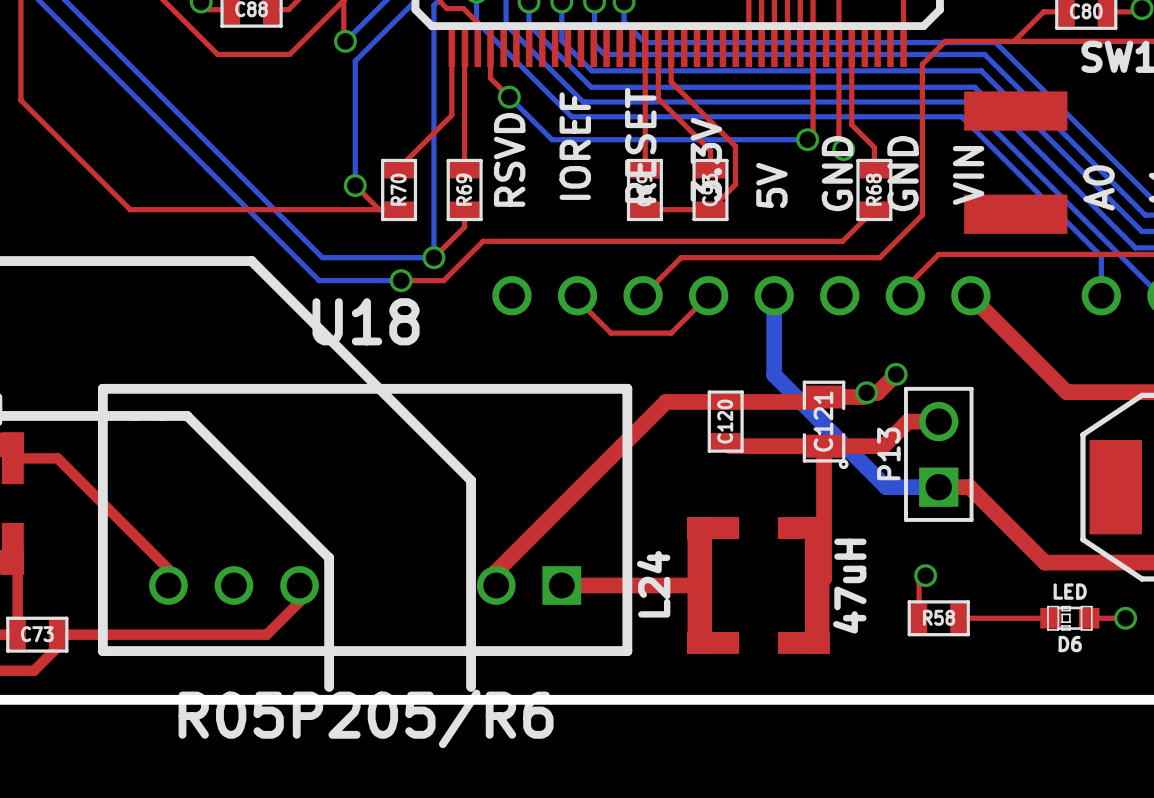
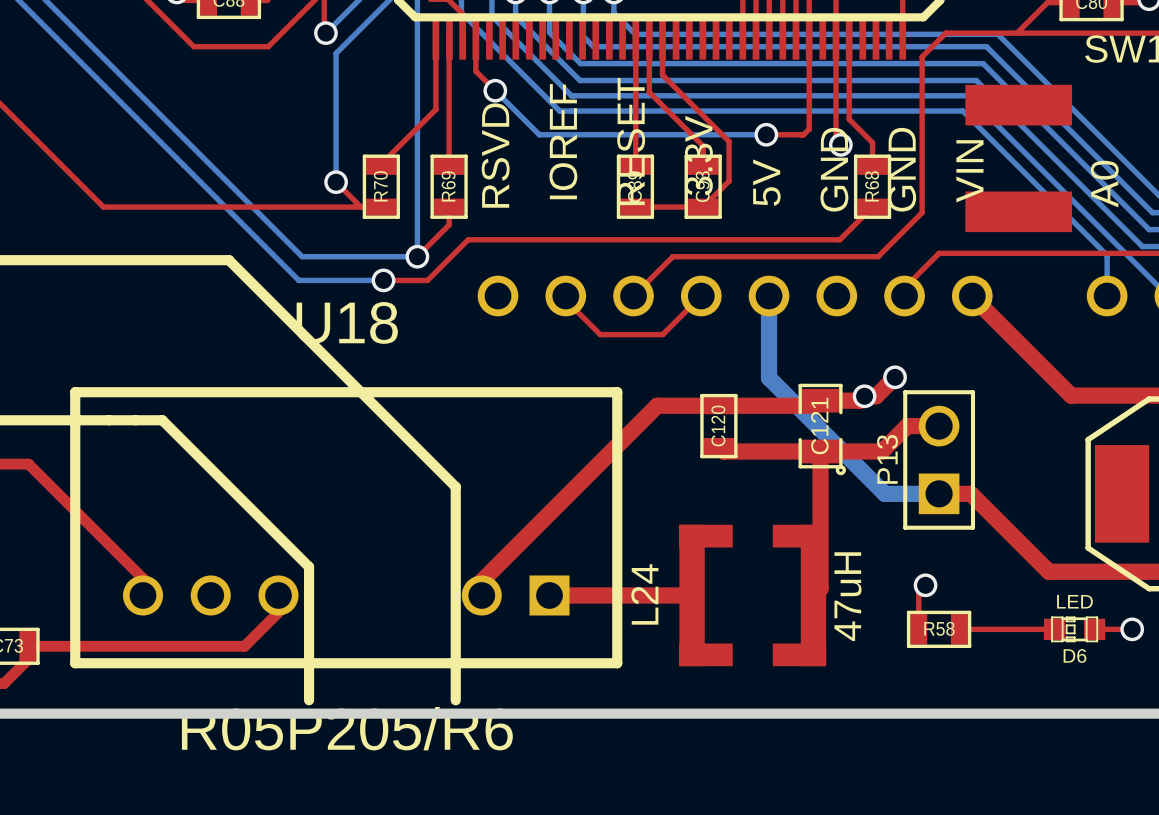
top track: none -> (766, 134) (803, 134)
bottom track: (771, 139) (807, 139) -> none
via position: (807, 139) -> (766, 134)

